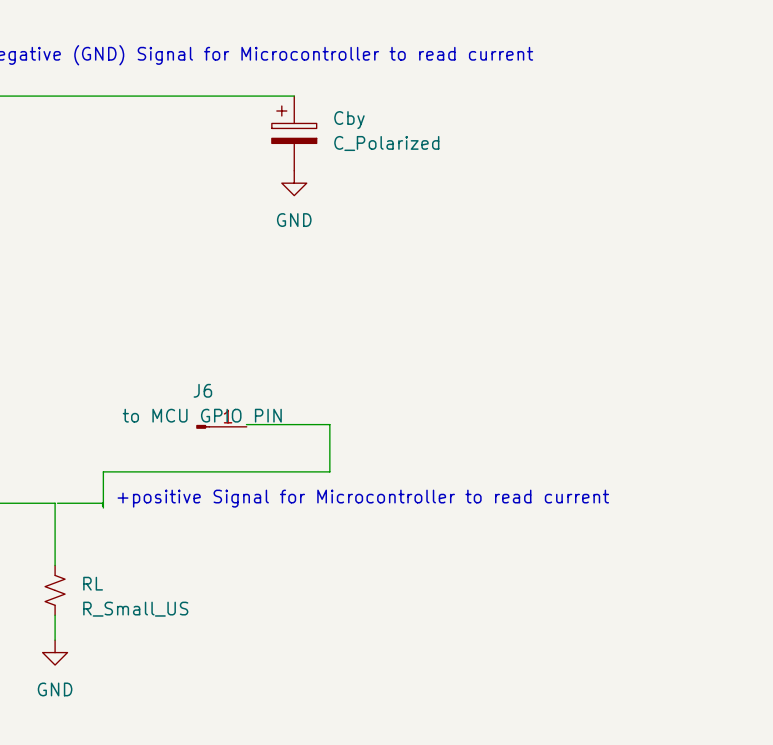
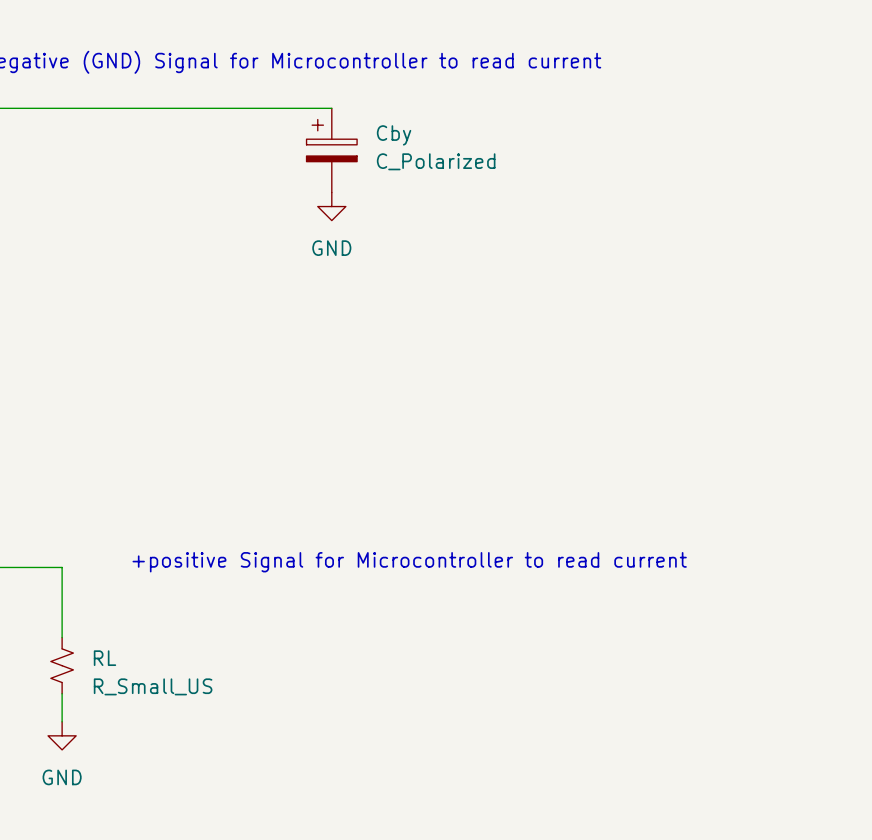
wire: (246, 424) (329, 424) (329, 471) (103, 471) (103, 507) -> none
J6: to MCU GPIO PIN (221, 426) -> none
wire: (57, 503) (102, 503) (102, 506) -> none

